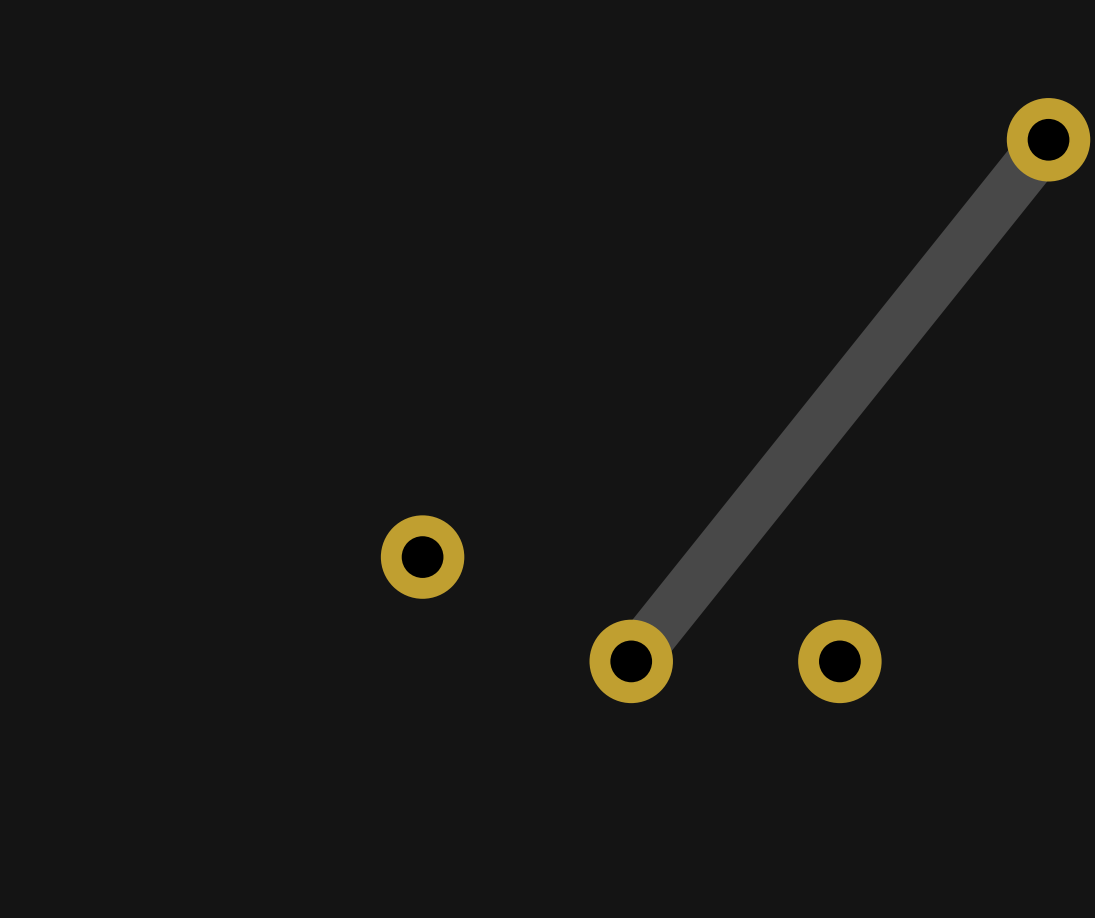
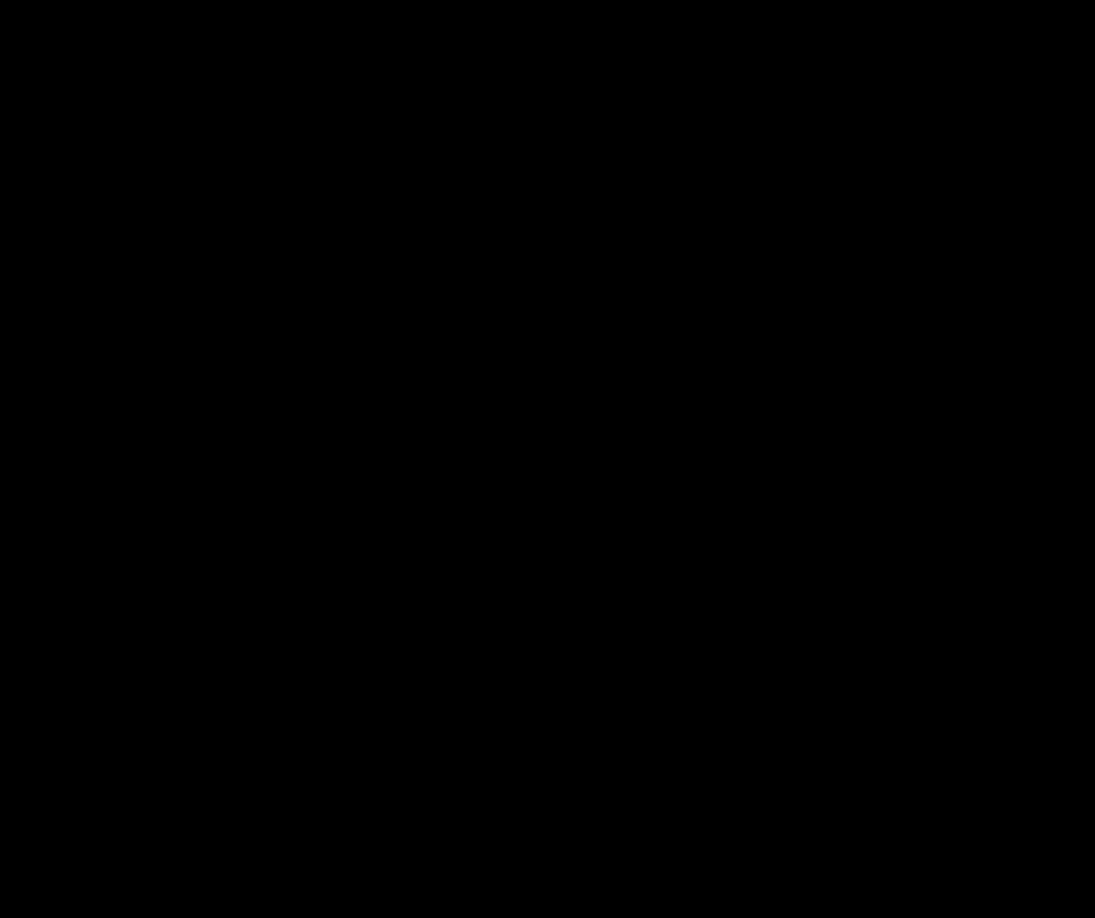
track: (1048, 139) (631, 661) -> none
via: (1048, 139) -> none
via: (422, 557) -> none
via: (631, 661) -> none
via: (839, 661) -> none

